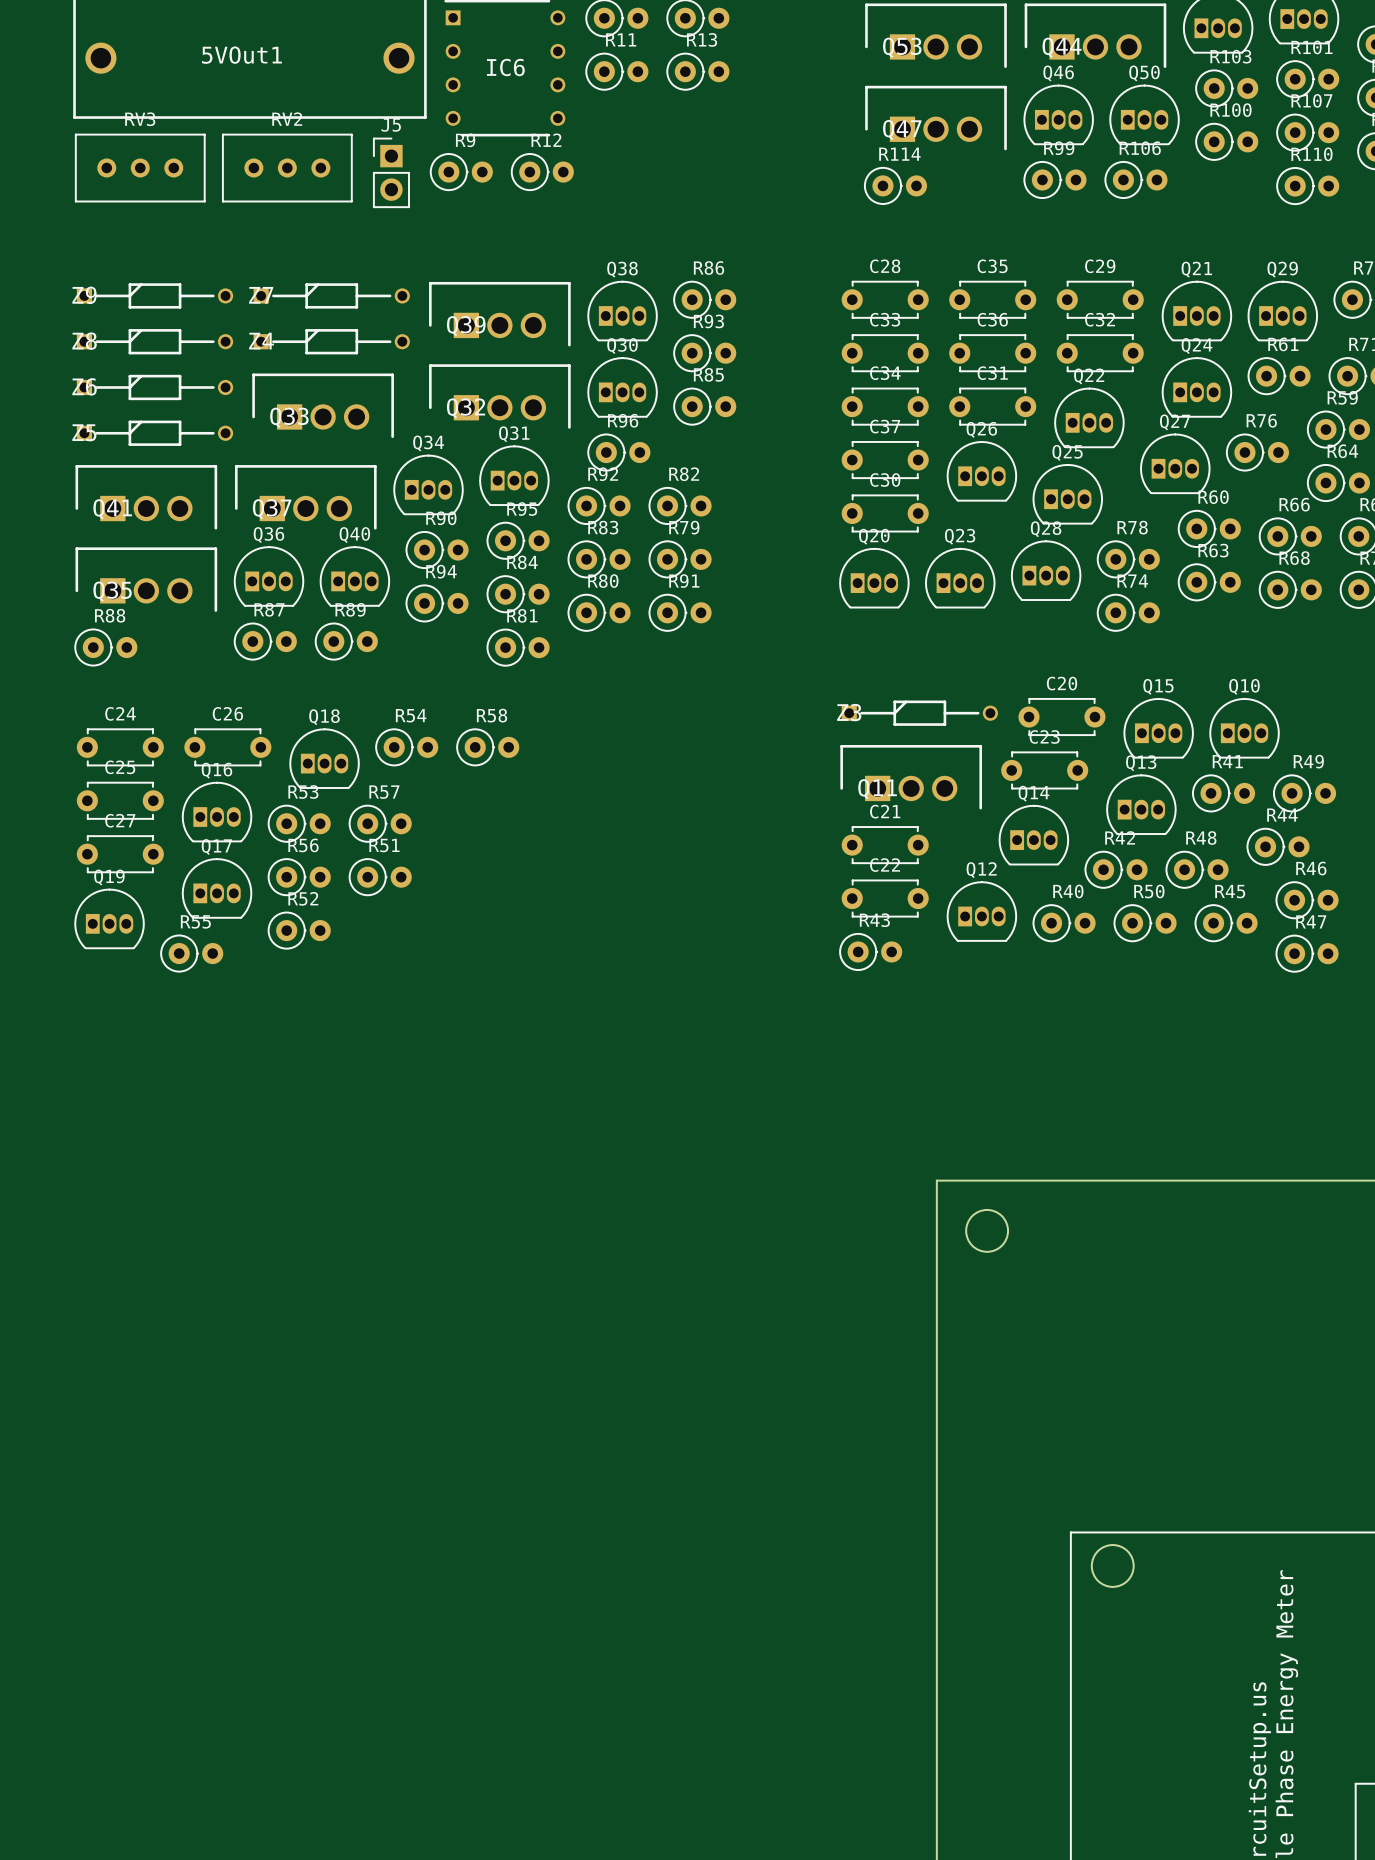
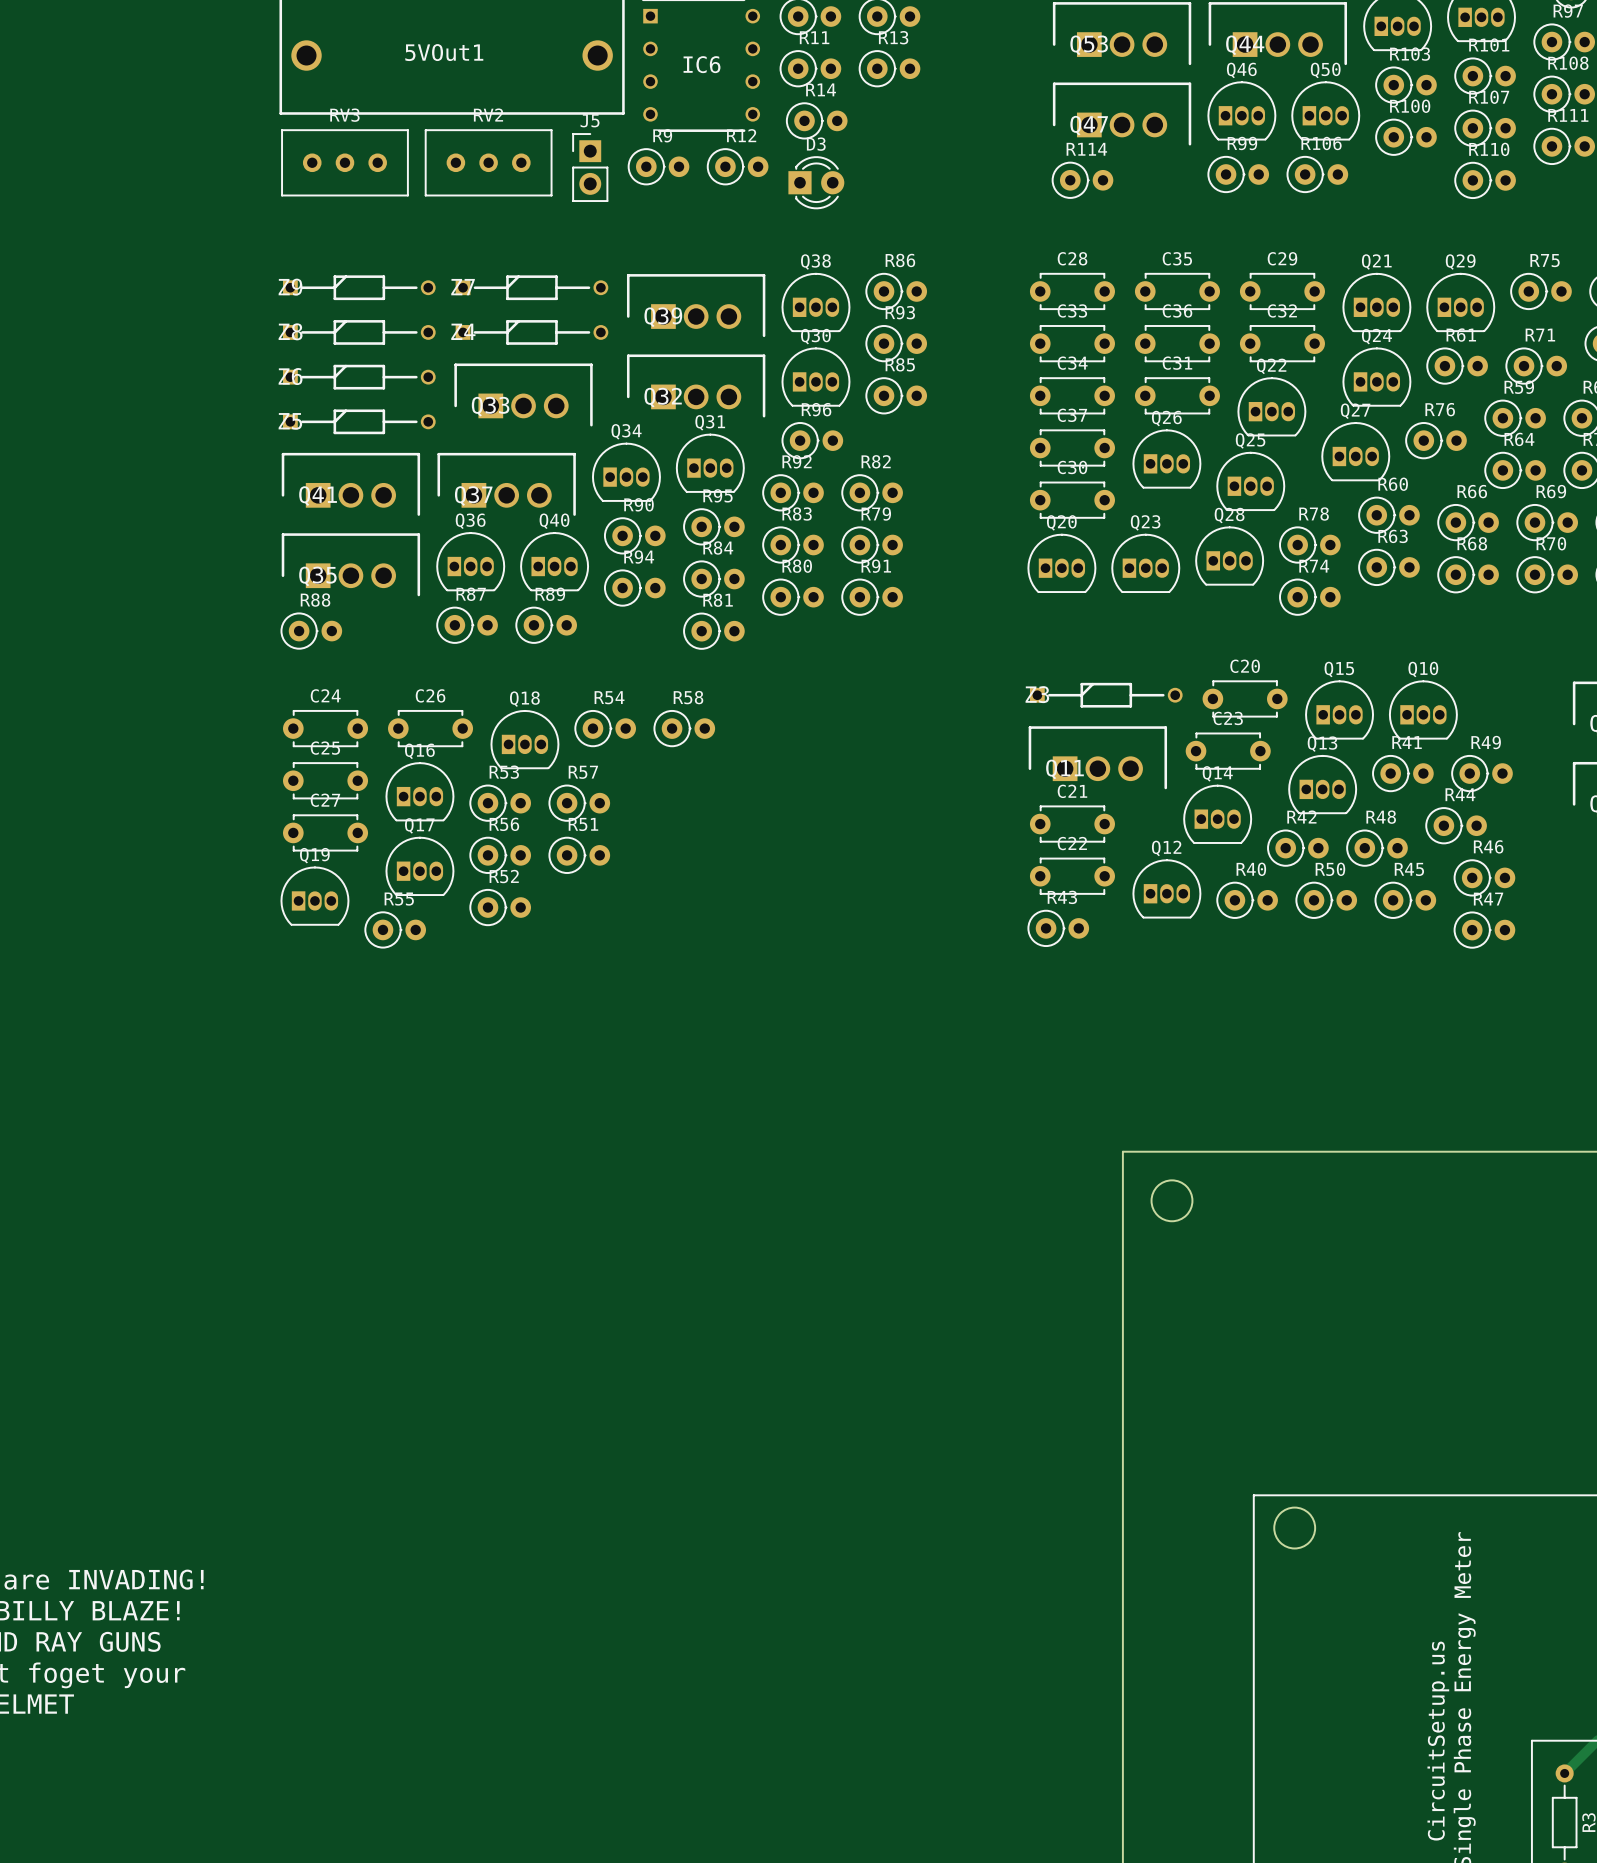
R14: none -> (816, 120)
D3: none -> (816, 182)

